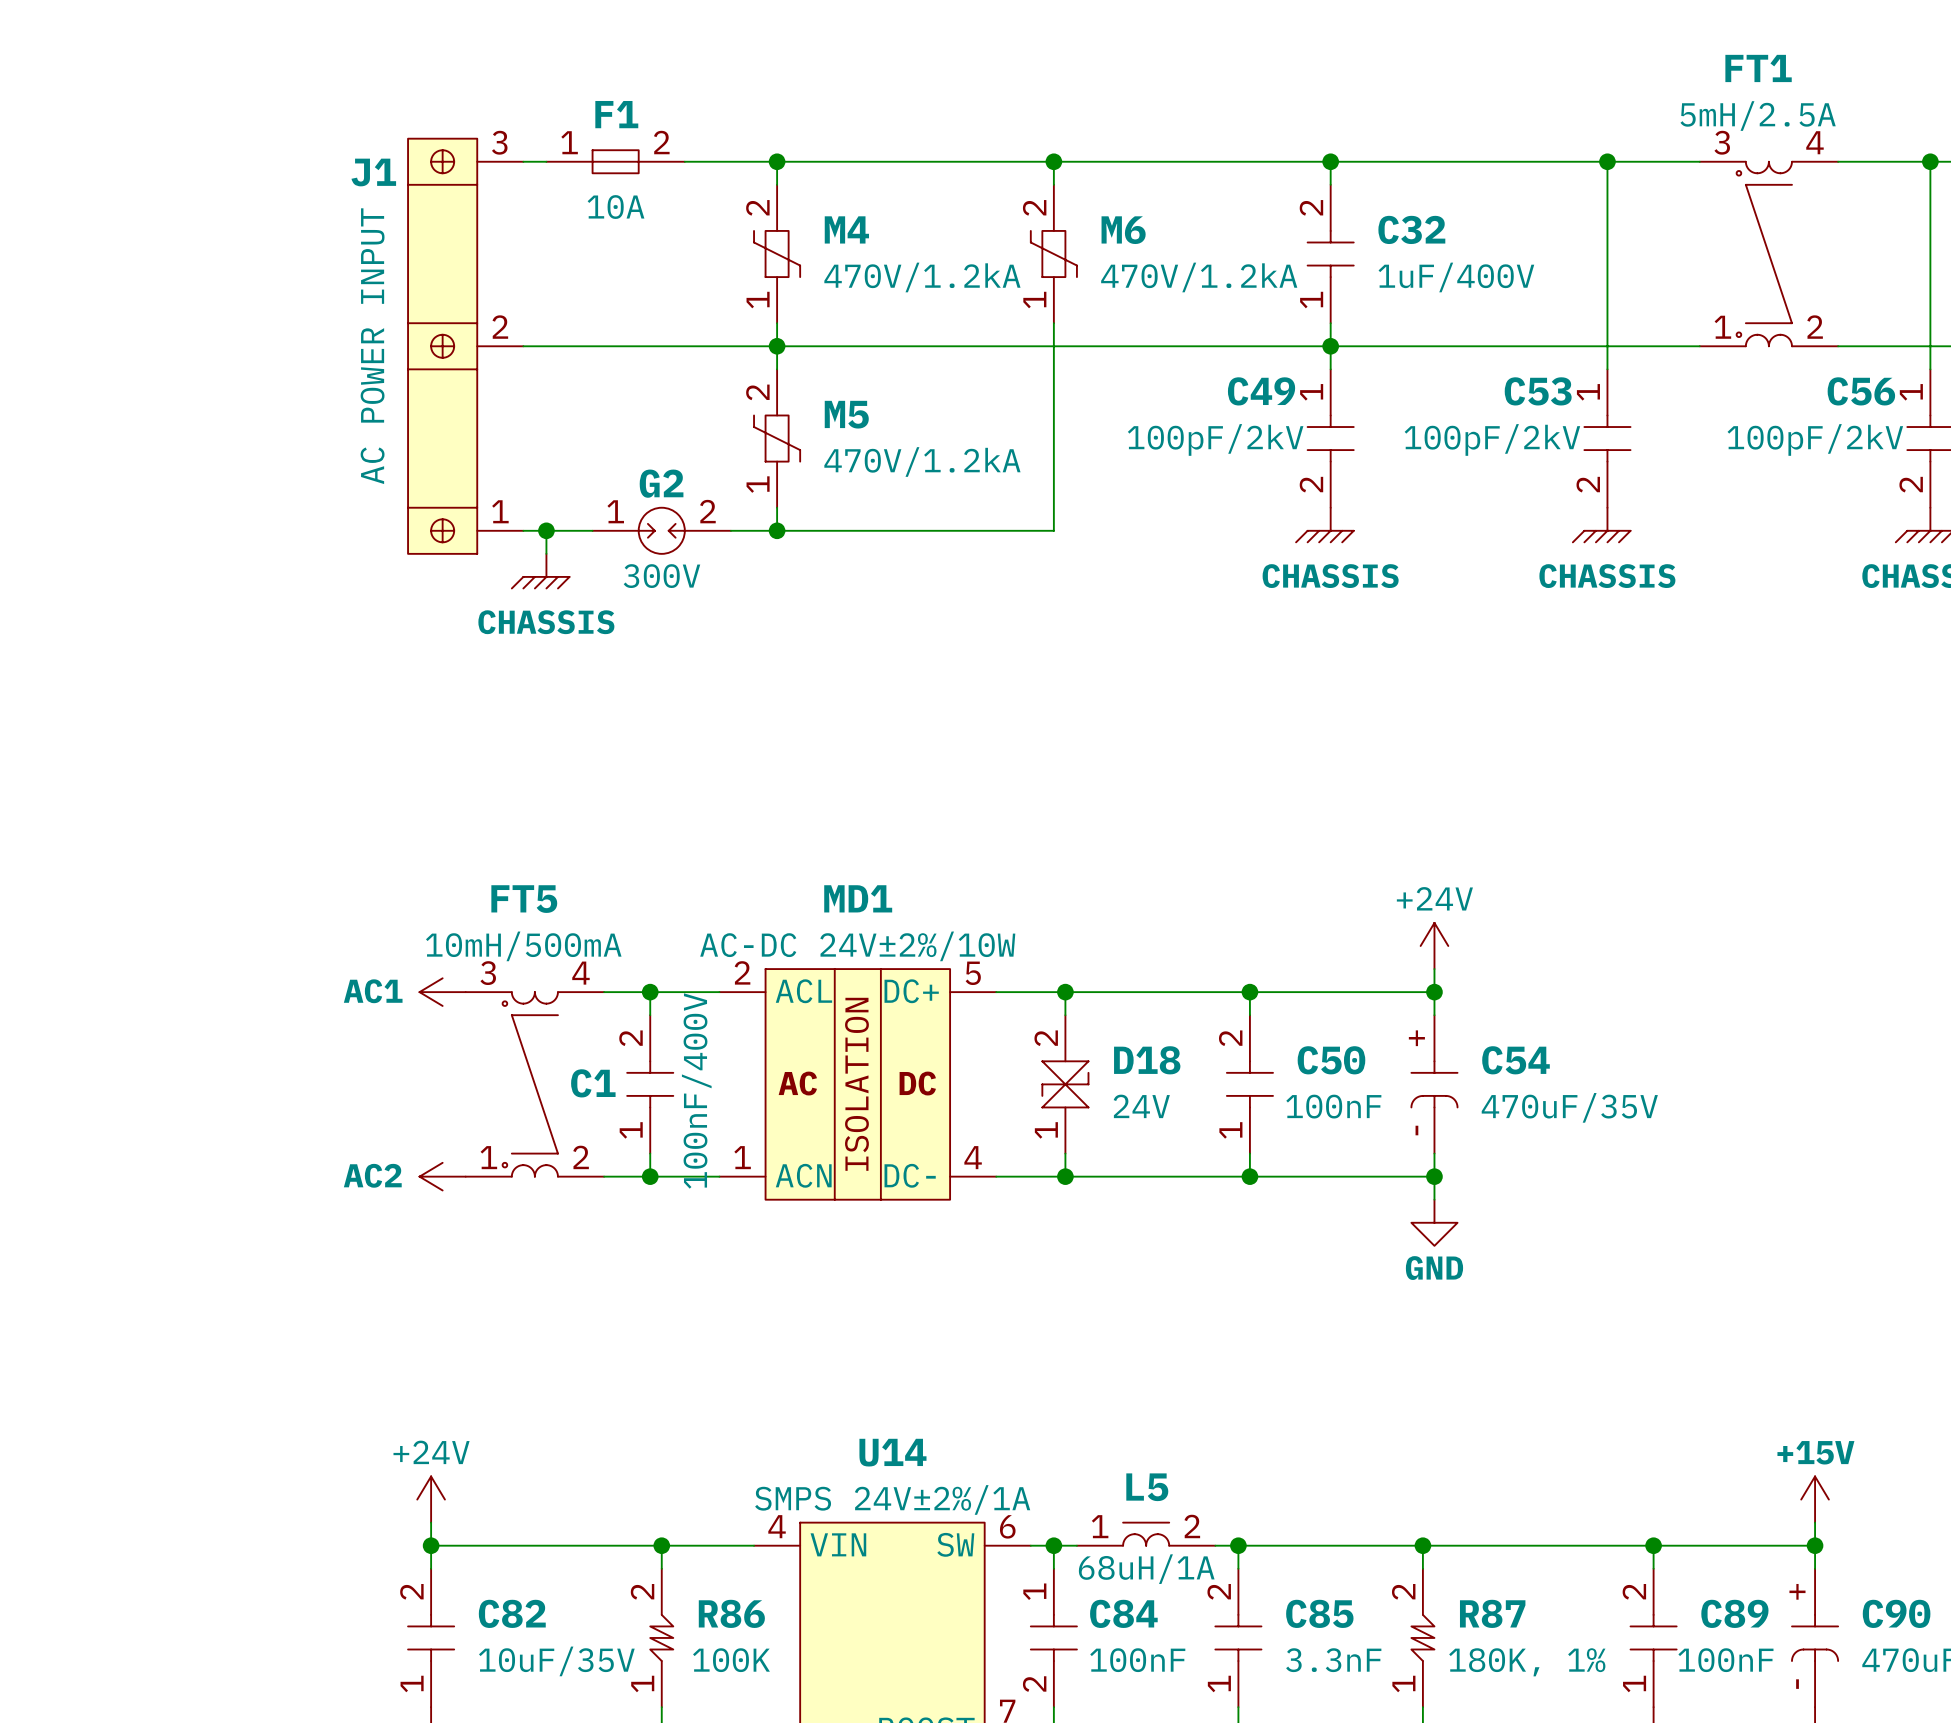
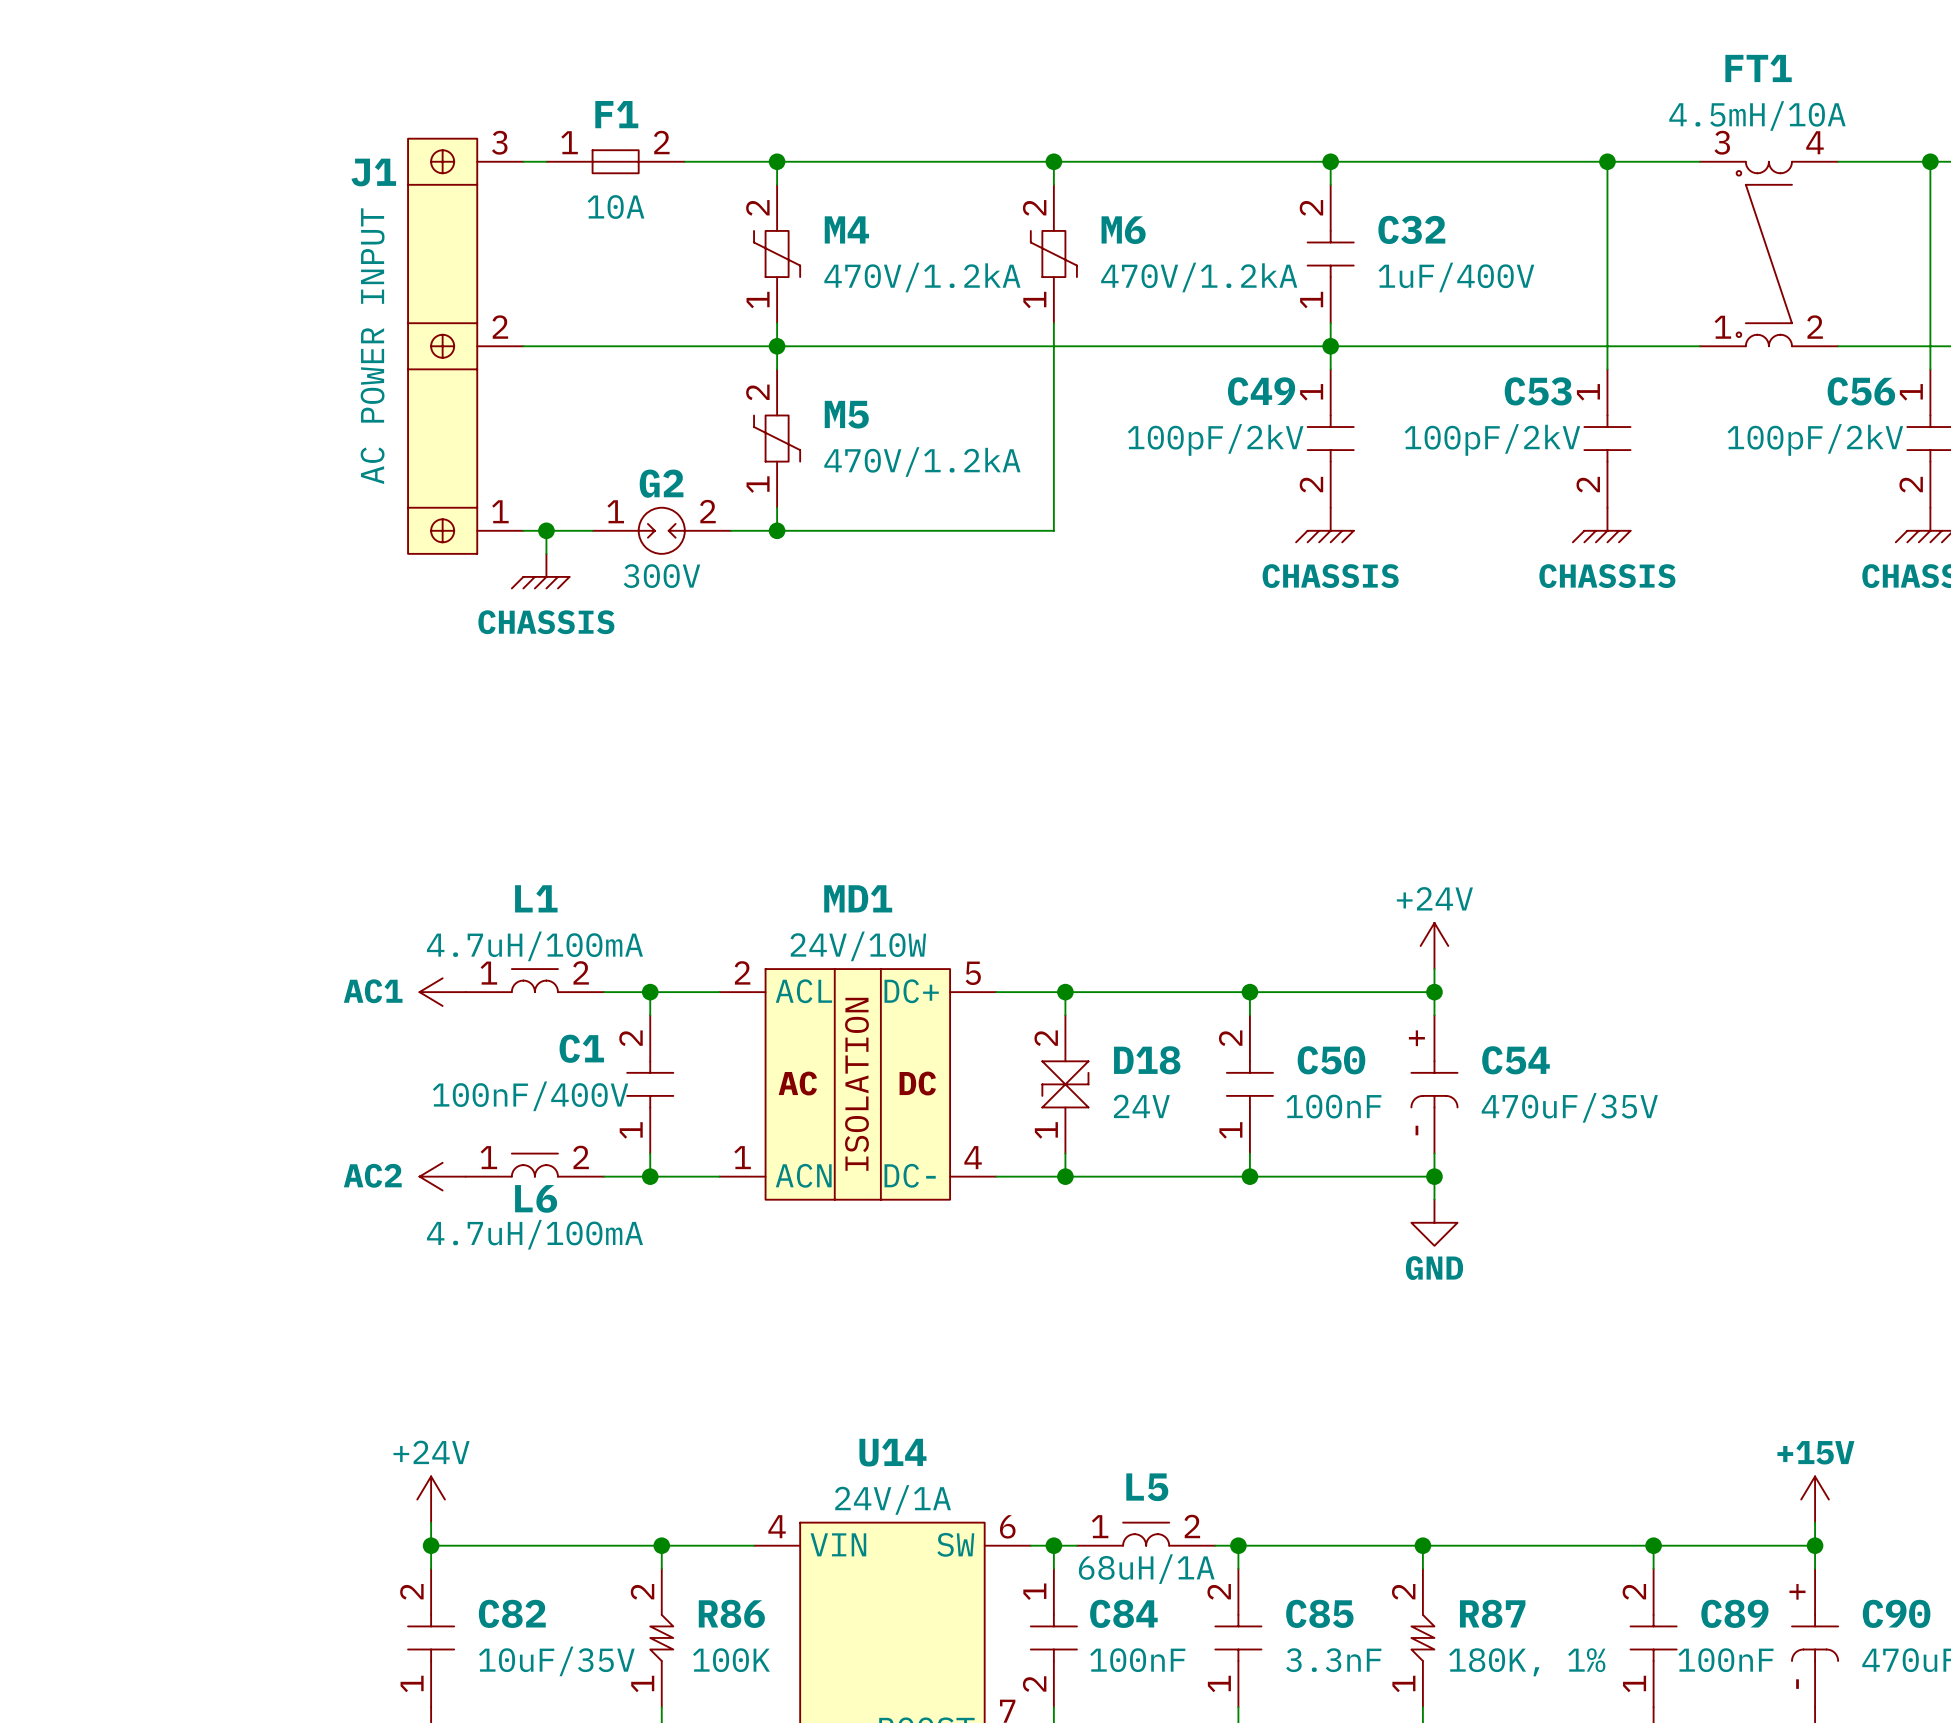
FT1 value: 5mH/2.5A (1758, 116) -> 4.5mH/10A (1757, 116)
MD1 value: AC-DC 24V±2%/10W (857, 946) -> 24V/10W (858, 946)
L1: none -> 4.7uH/100mA (534, 980)
C1 name position: C1 (593, 1083) -> C1 (581, 1048)
FT5: 10mH/500mA (534, 1084) -> none
C1 value rotation: 0° (696, 1090) -> 90° clockwise (530, 1096)
L6: none -> 4.7uH/100mA (534, 1165)
U14 value: SMPS 24V±2%/1A (892, 1499) -> 24V/1A (893, 1499)

